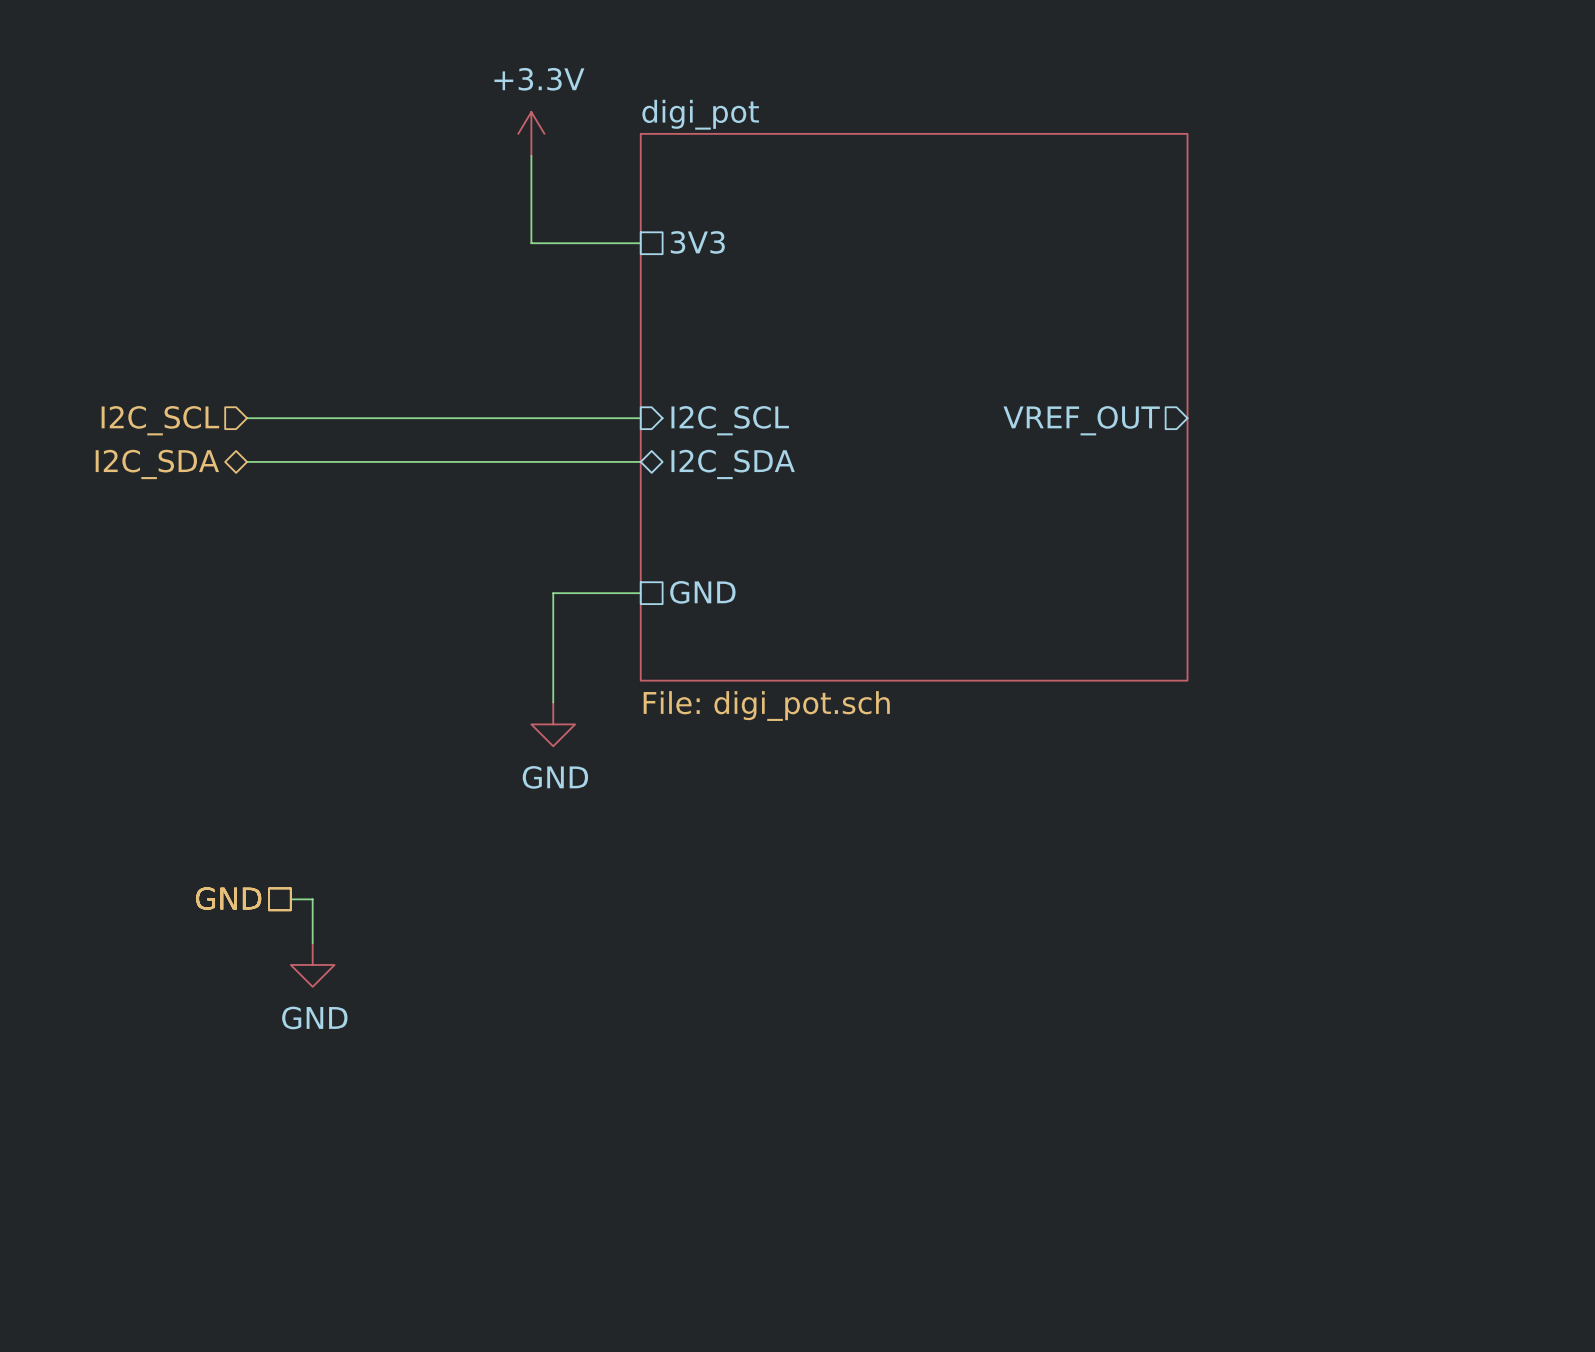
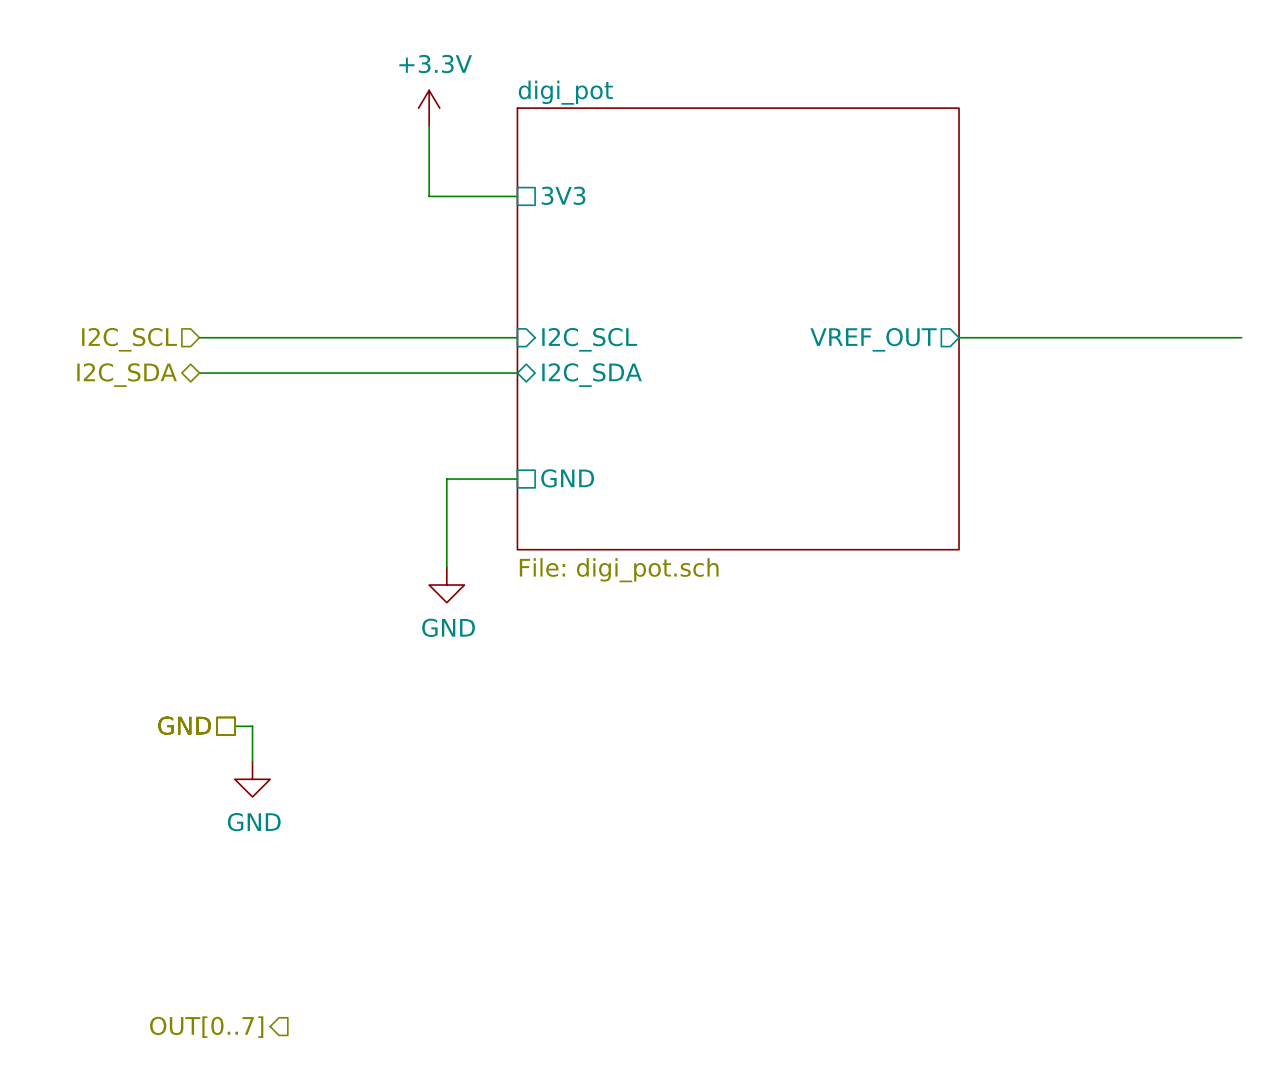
wire: none -> (959, 337) (1241, 337)
hierarchical label: none -> OUT[0..7] (206, 1027)

